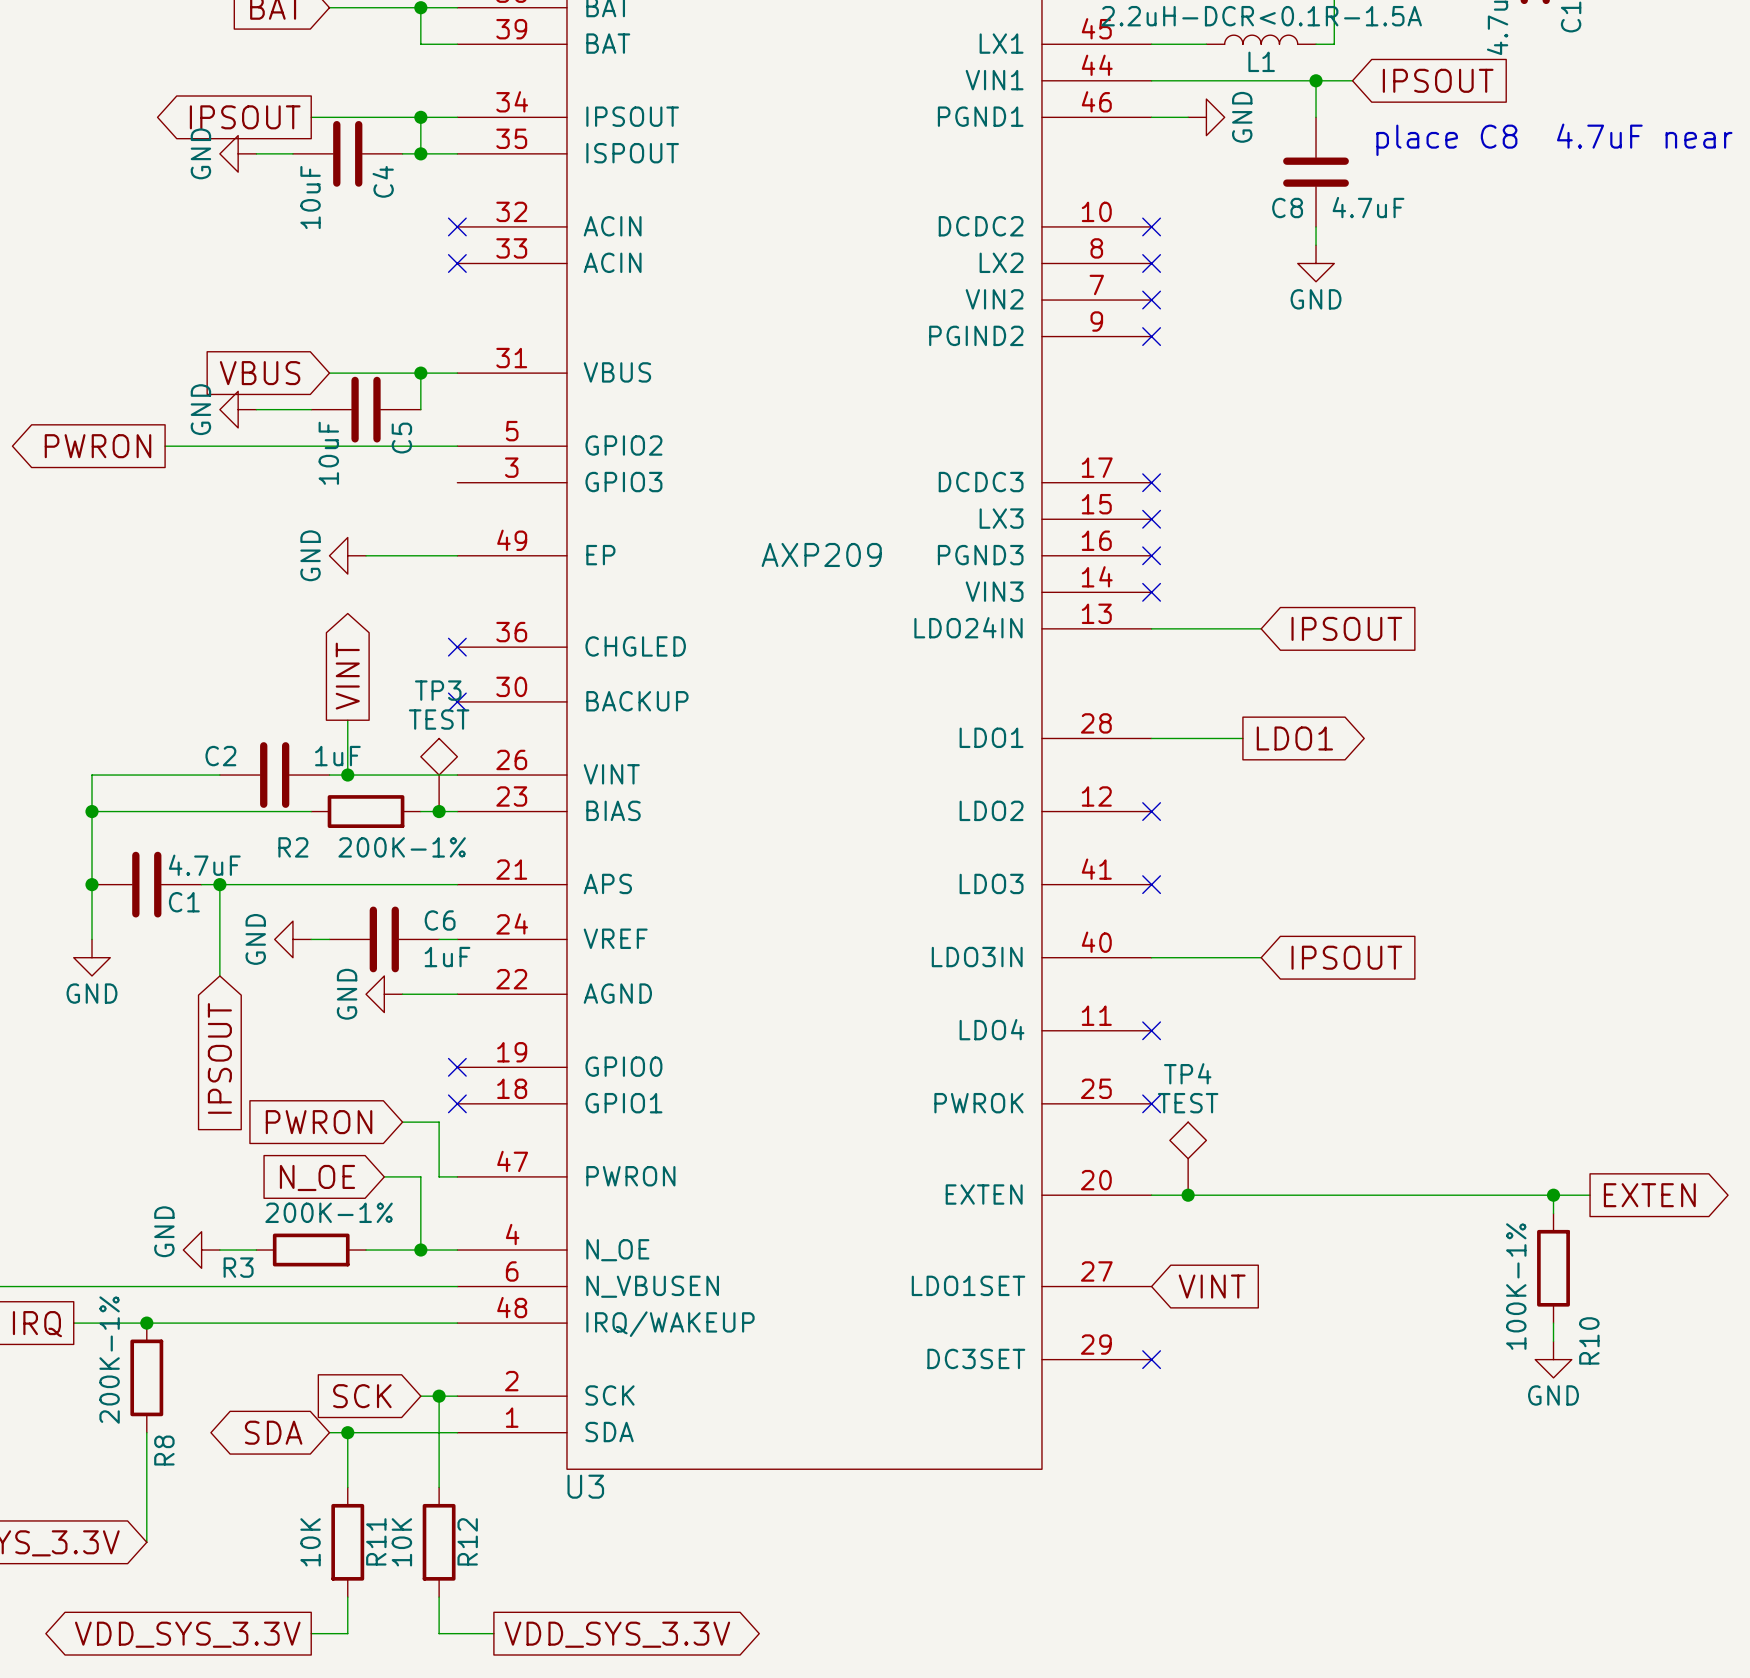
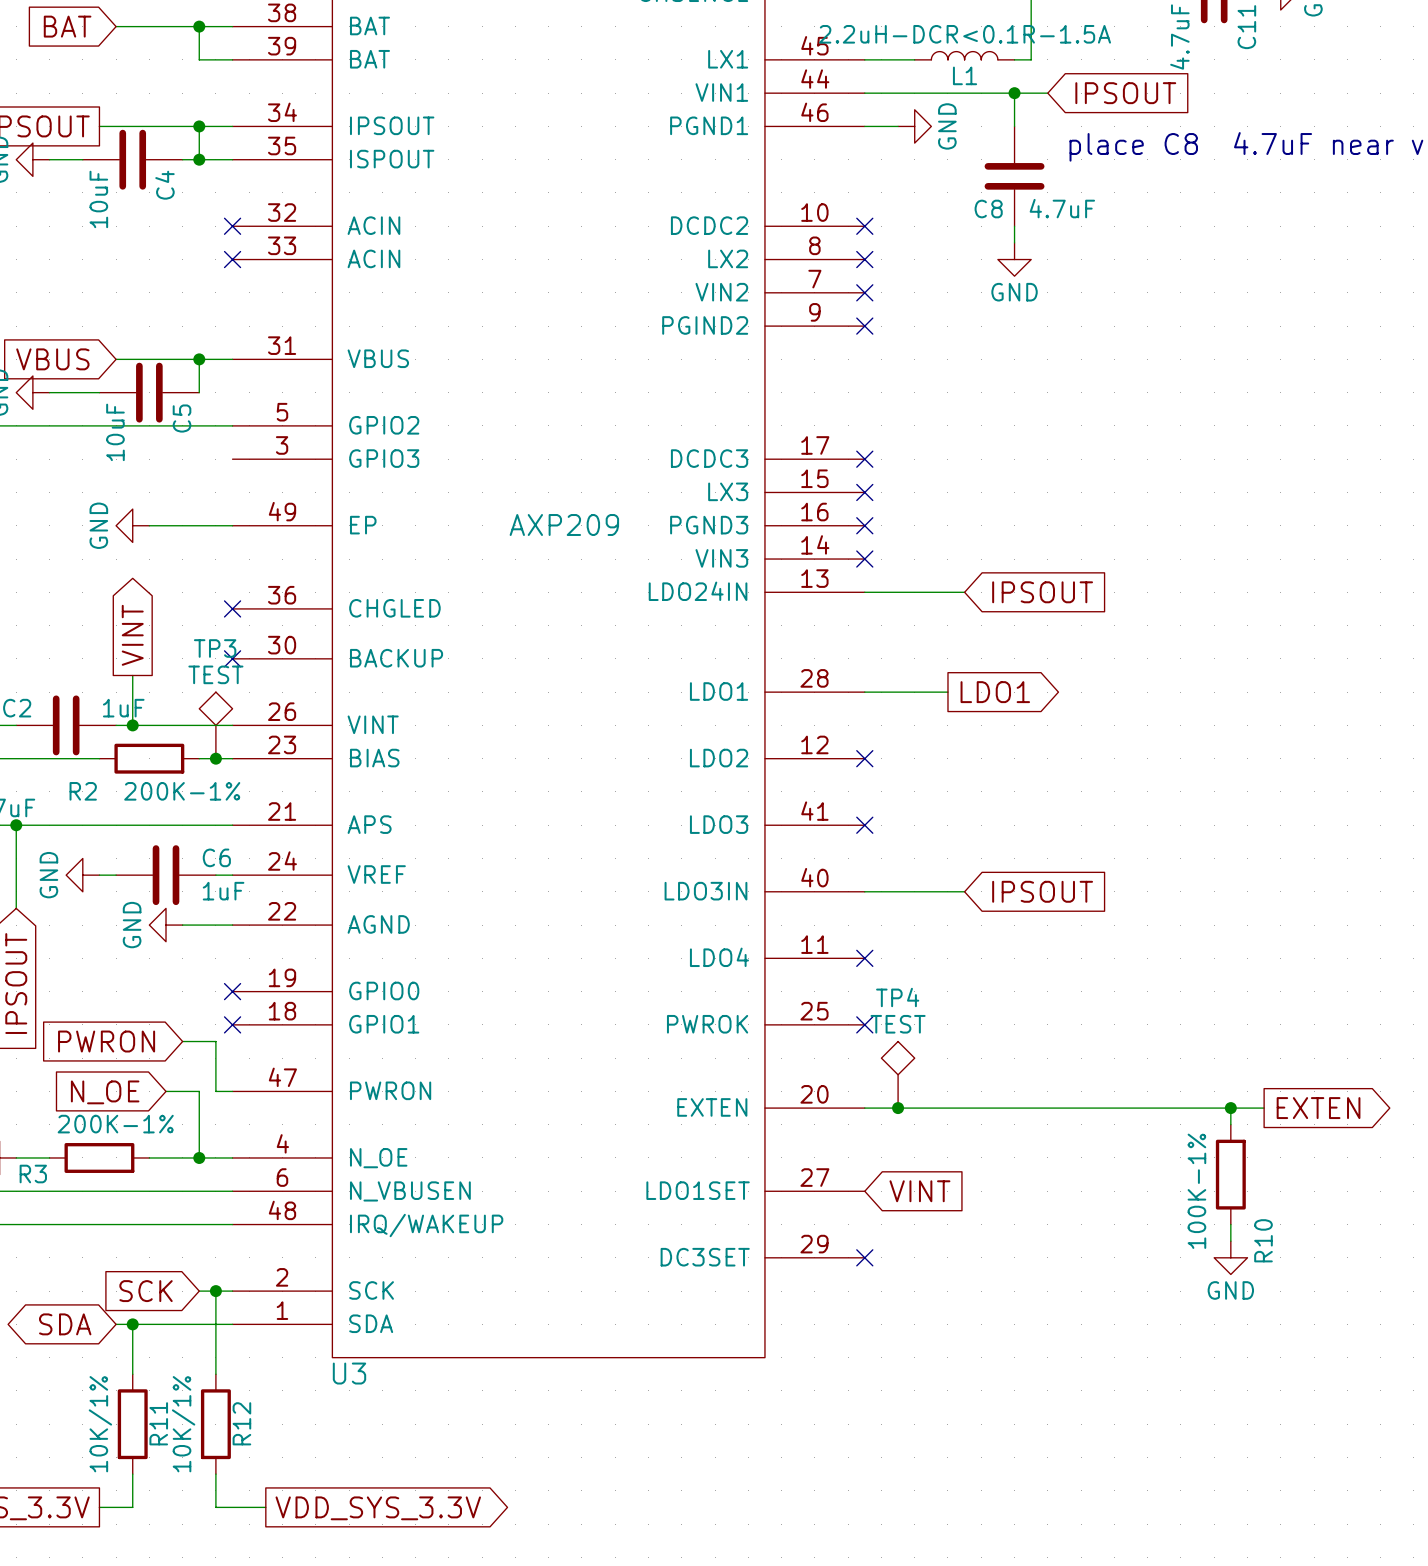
R11 value: 10K (310, 1542) -> 10K/1% (100, 1424)
R12 value: 10K (401, 1542) -> 10K/1% (183, 1424)

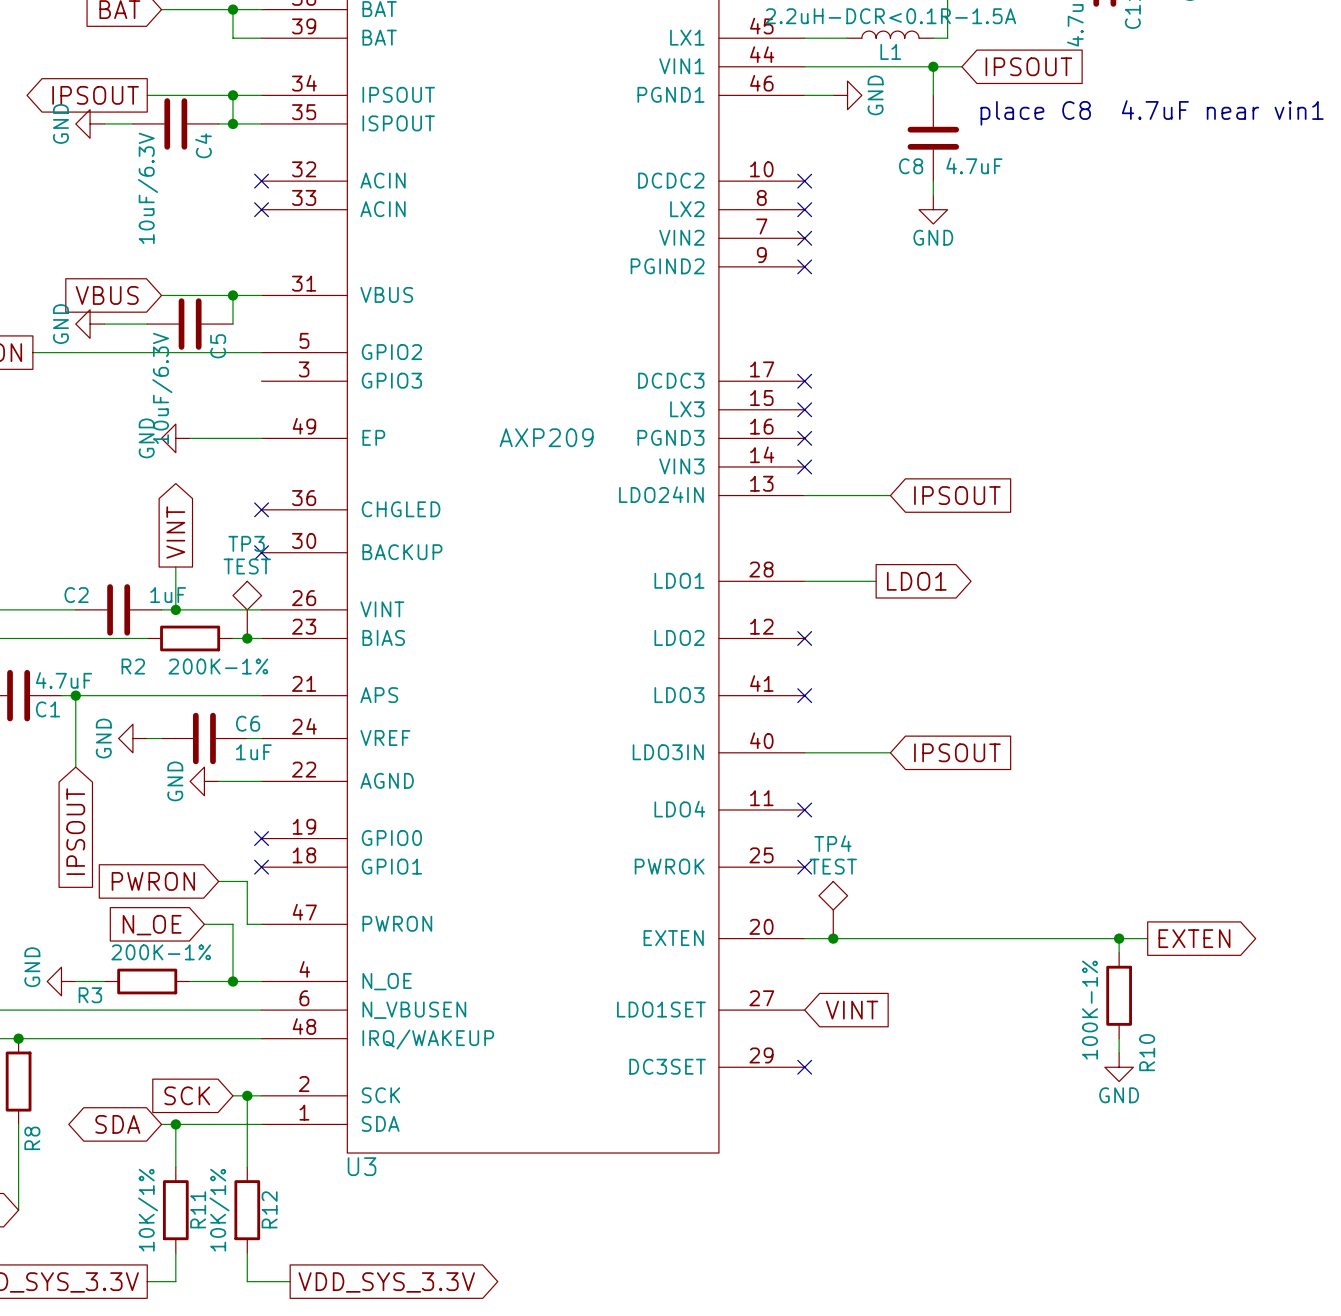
C4 value: 10uF (98, 199) -> 10uF/6.3V (148, 188)
C5 value: 10uF (115, 432) -> 10uF/6.3V (162, 388)

